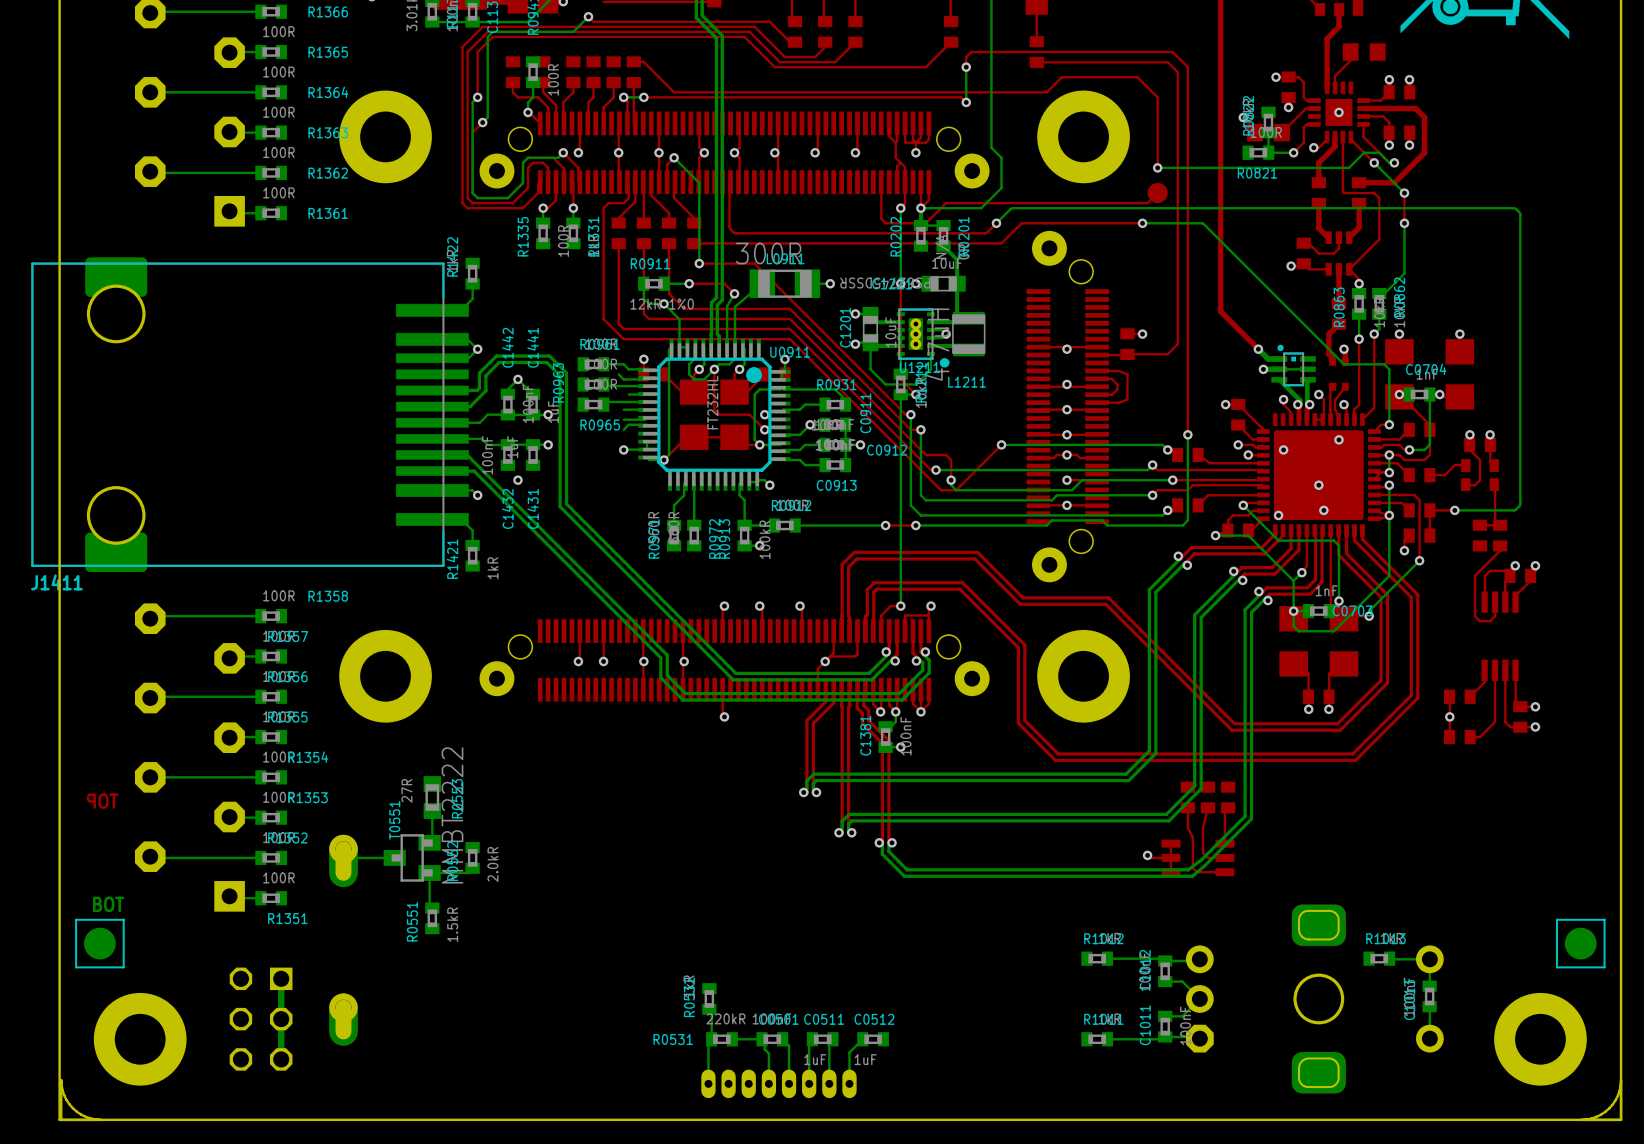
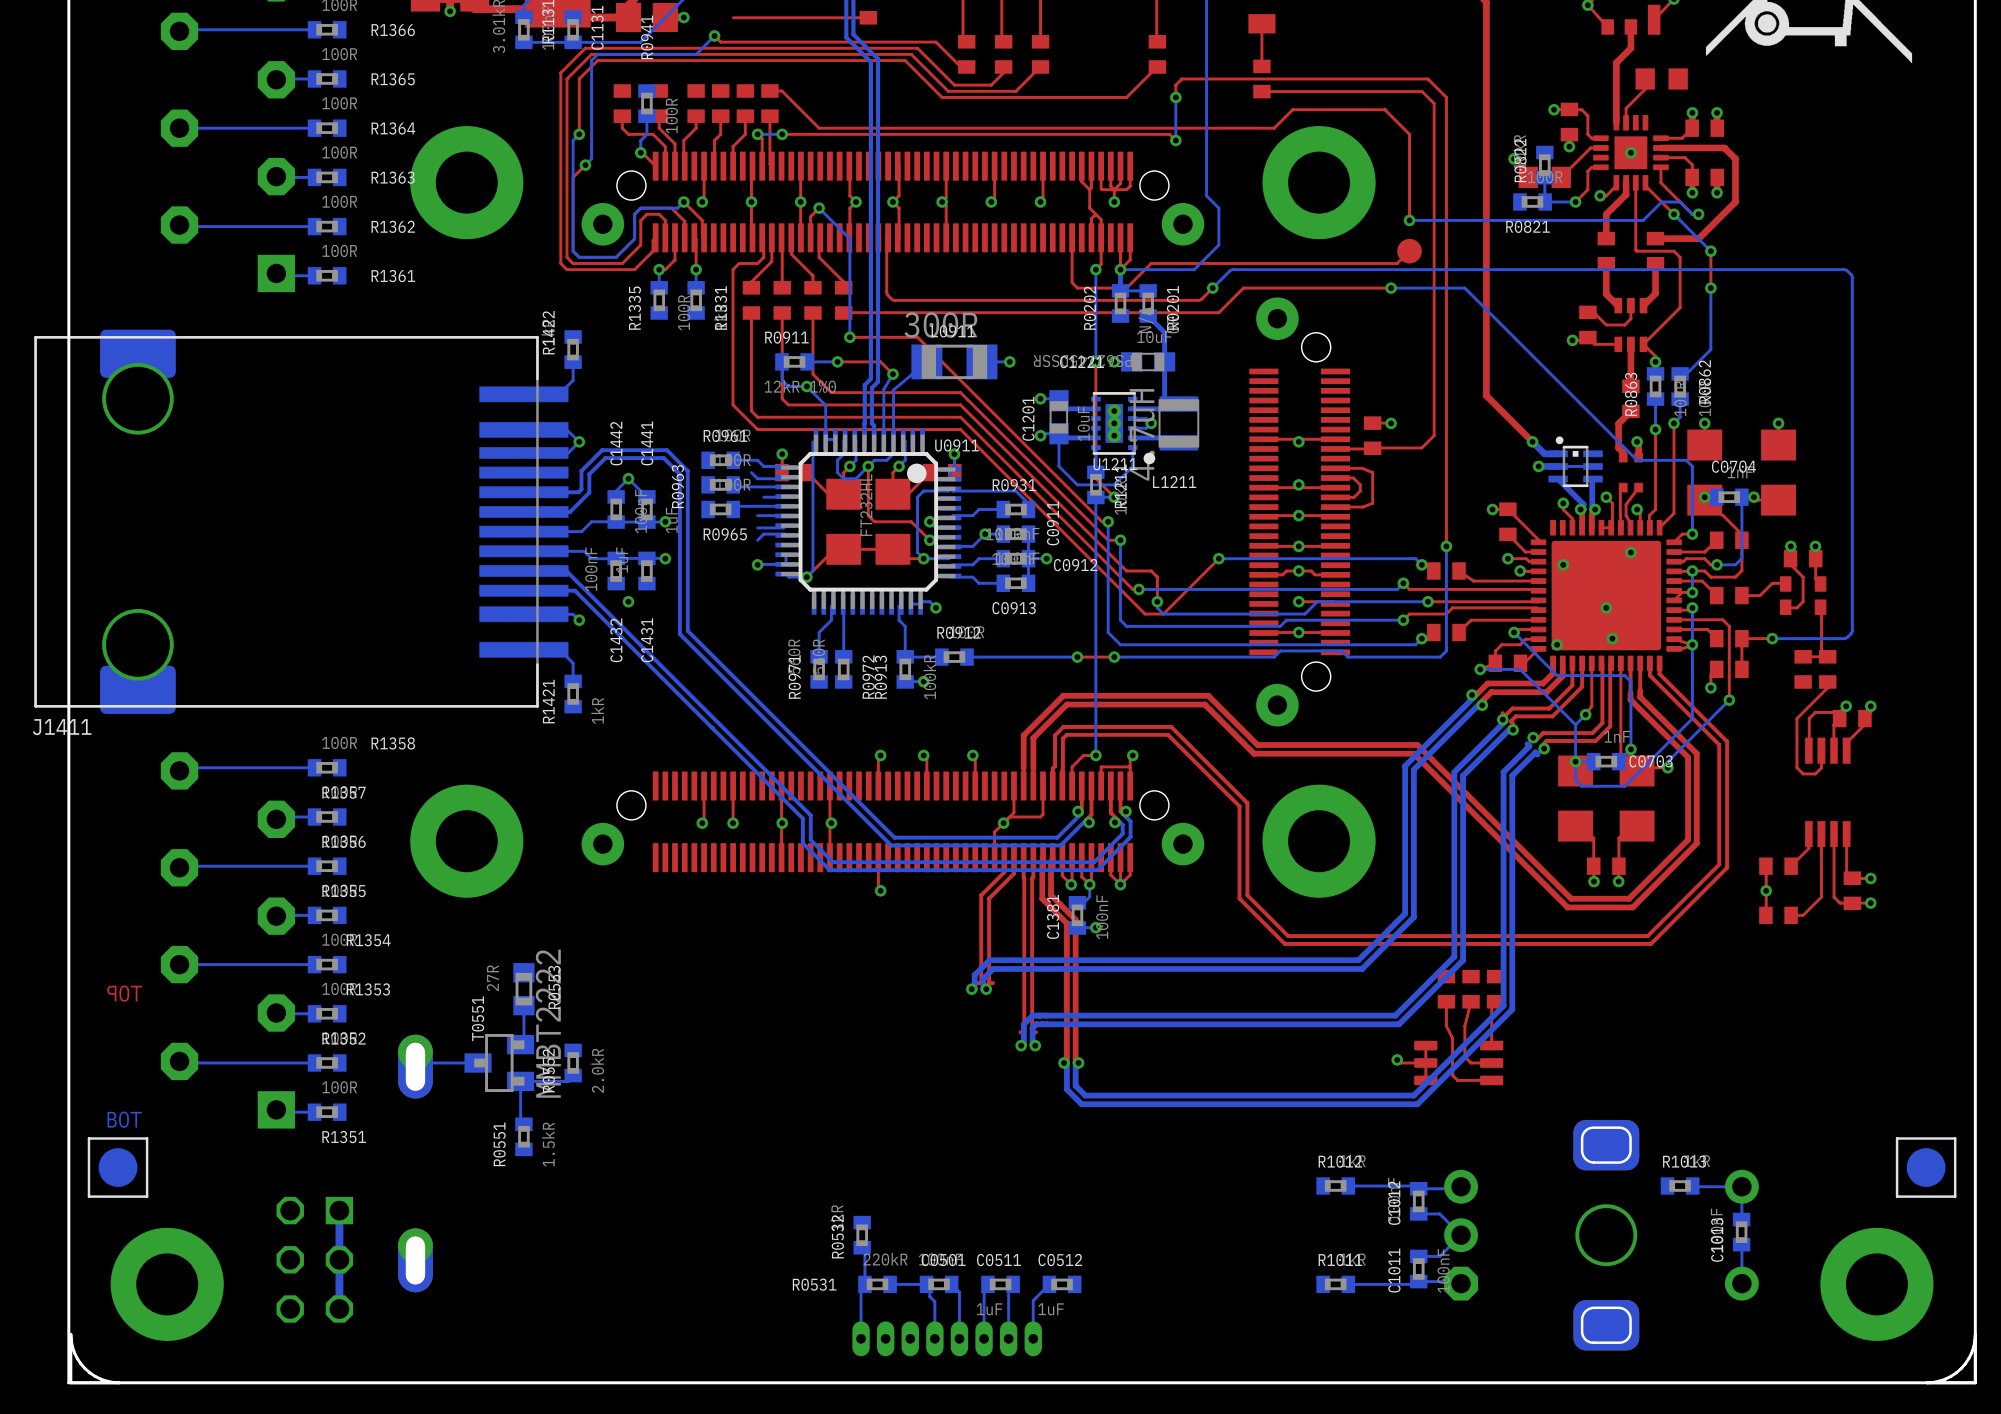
top track: (1275, 534) (1262, 547) (1191, 547) (1180, 558) (1178, 556) -> (1553, 667) (1553, 673) (1543, 683) (1487, 683) (1474, 697) (1472, 695)
top track: (1283, 535) (1264, 553) (1194, 553) (1185, 563) (1187, 565) -> (1562, 669) (1562, 676) (1546, 692) (1491, 692) (1480, 703) (1482, 705)
top track: (1346, 553) (1387, 594) (1387, 682) (1340, 730) (1231, 730) (1105, 604) (1020, 604) (974, 558) (856, 558) (848, 567) (849, 617) -> (1640, 690) (1640, 697) (1696, 753) (1696, 843) (1632, 907) (1567, 907) (1413, 753) (1253, 753) (1204, 704) (1066, 704) (1033, 738) (1033, 768)
top track: (1338, 554) (1381, 597) (1381, 680) (1337, 723) (1234, 723) (1108, 597) (1022, 597) (977, 552) (854, 552) (842, 564) (841, 616) -> (1630, 693) (1630, 699) (1688, 757) (1688, 839) (1629, 898) (1571, 898) (1417, 744) (1257, 744) (1208, 695) (1063, 695) (1023, 735) (1023, 768)
bottom track: (1178, 556) (1180, 558) (1149, 589) (1149, 750) (1126, 774) (813, 774) (806, 781) (806, 792) (803, 792) -> none
via: (1178, 556) -> none
bottom track: none -> (1472, 695) (1474, 697) (1405, 765) (1405, 913) (1358, 960) (989, 960) (974, 975) (974, 989) (971, 989)
via: none -> (1472, 695)
bottom track: none -> (1482, 705) (1480, 703) (1413, 769) (1413, 917) (1362, 968) (993, 968) (983, 978) (983, 989) (986, 989)
via: none -> (1482, 705)
bottom track: (1187, 565) (1185, 563) (1155, 592) (1155, 753) (1128, 780) (816, 780) (813, 783) (813, 792) (816, 792) -> none
via: (1187, 565) -> none
bottom track: (1233, 571) (1235, 573) (1194, 614) (1194, 786) (1166, 814) (849, 814) (842, 821) (842, 832) (838, 832) -> none
via: (1233, 571) -> none
bottom track: none -> (1502, 719) (1504, 721) (1454, 772) (1454, 956) (1395, 1015) (1032, 1015) (1023, 1024) (1023, 1044) (1021, 1045)
via: none -> (1502, 719)
bottom track: (1242, 580) (1240, 578) (1201, 617) (1201, 788) (1169, 820) (851, 820) (848, 824) (848, 832) (851, 832) -> none
via: (1242, 580) -> none
bottom track: none -> (1513, 729) (1511, 727) (1463, 775) (1463, 960) (1399, 1024) (1036, 1024) (1032, 1027) (1032, 1044) (1035, 1045)
via: none -> (1513, 729)
bottom track: (1258, 591) (1261, 593) (1245, 609) (1245, 816) (1201, 859) (1188, 869) (907, 869) (888, 851) (888, 842) (892, 842) -> none
bottom track: none -> (1527, 744) (1529, 746) (1503, 772) (1503, 1005) (1413, 1095) (1085, 1095) (1075, 1085) (1075, 1063) (1078, 1063)
bottom track: (1267, 600) (1265, 598) (1251, 612) (1251, 818) (1192, 876) (904, 876) (882, 854) (882, 842) (879, 842) -> none
bottom track: none -> (1537, 754) (1535, 752) (1512, 775) (1512, 1009) (1417, 1104) (1081, 1104) (1066, 1089) (1066, 1063) (1064, 1063)
top track: (857, 689) (857, 708) (862, 713) (862, 723) (882, 743) (882, 842) (879, 842) -> (1043, 857) (1042, 898) (1066, 923) (1066, 1063) (1064, 1063)
top track: (865, 689) (863, 705) (868, 710) (868, 720) (888, 740) (888, 842) (892, 842) -> (1052, 857) (1051, 895) (1075, 919) (1075, 1063) (1078, 1063)
via: (803, 792) -> none
via: (816, 792) -> none
via: none -> (971, 989)
via: none -> (986, 989)
via: (838, 832) -> none
via: (851, 832) -> none
via: (879, 842) -> none
via: (892, 842) -> none
via: none -> (1021, 1045)
via: none -> (1035, 1045)
via: none -> (1064, 1063)
via: none -> (1078, 1063)

